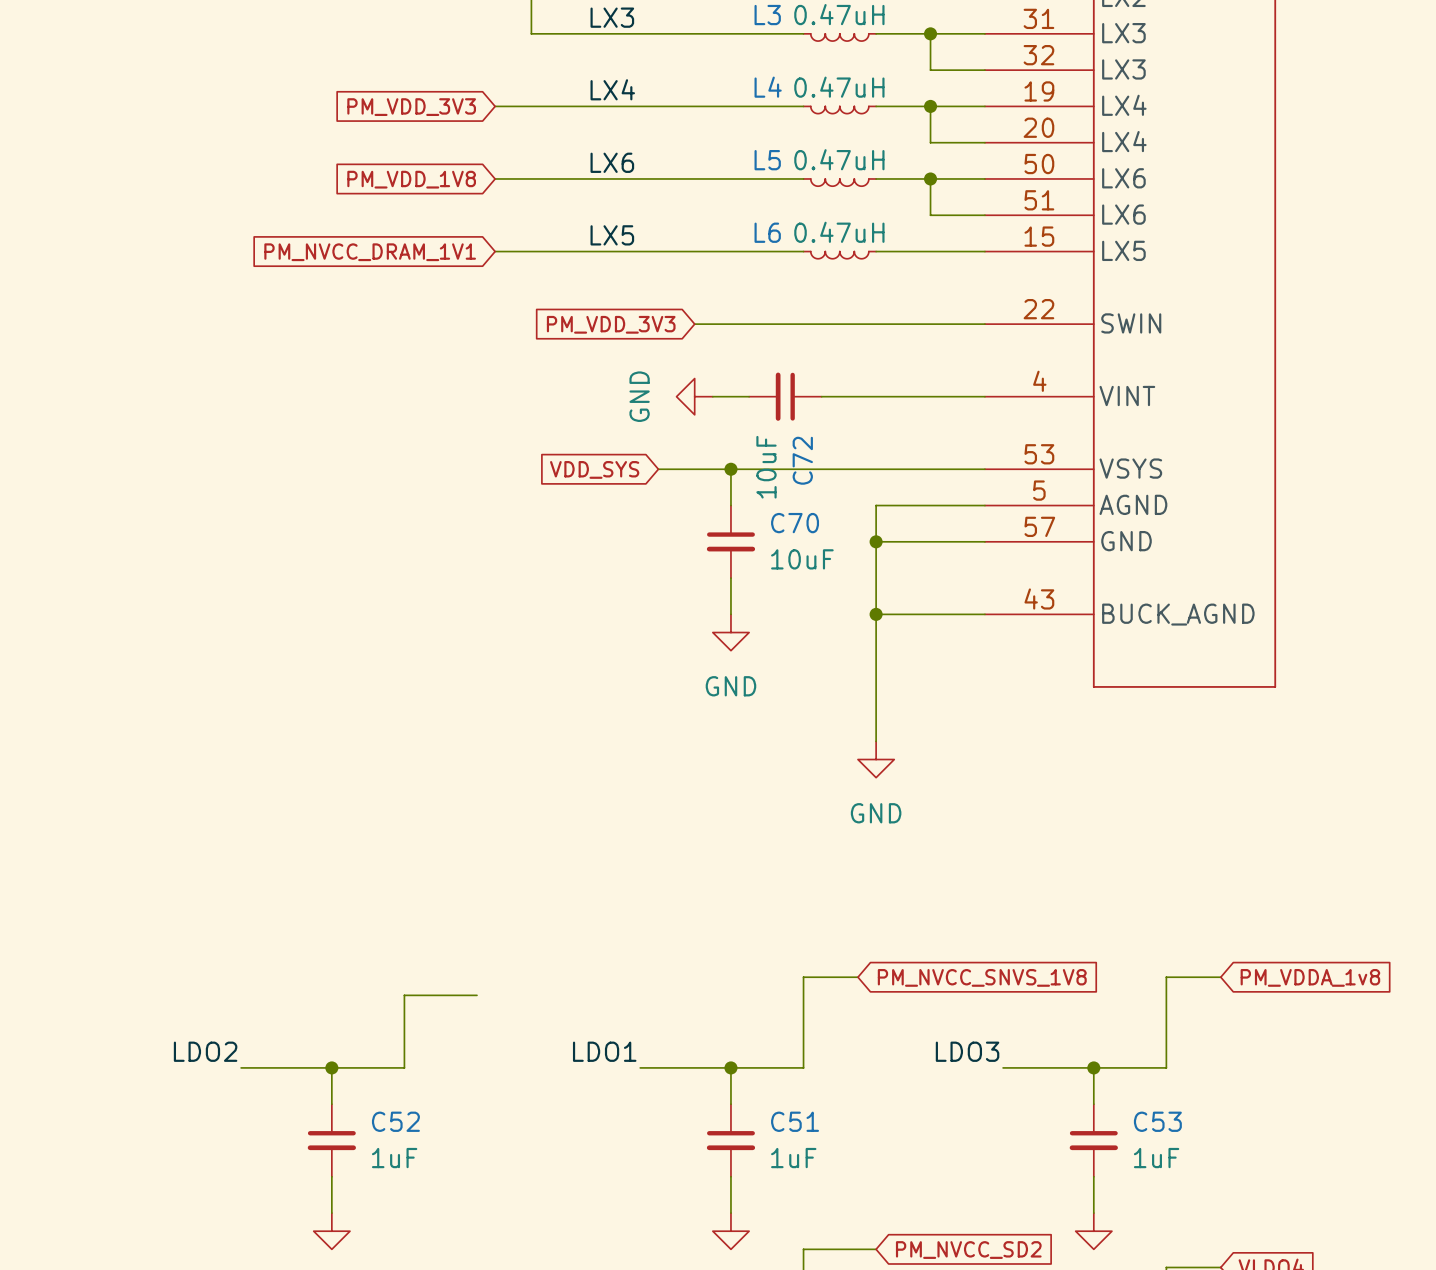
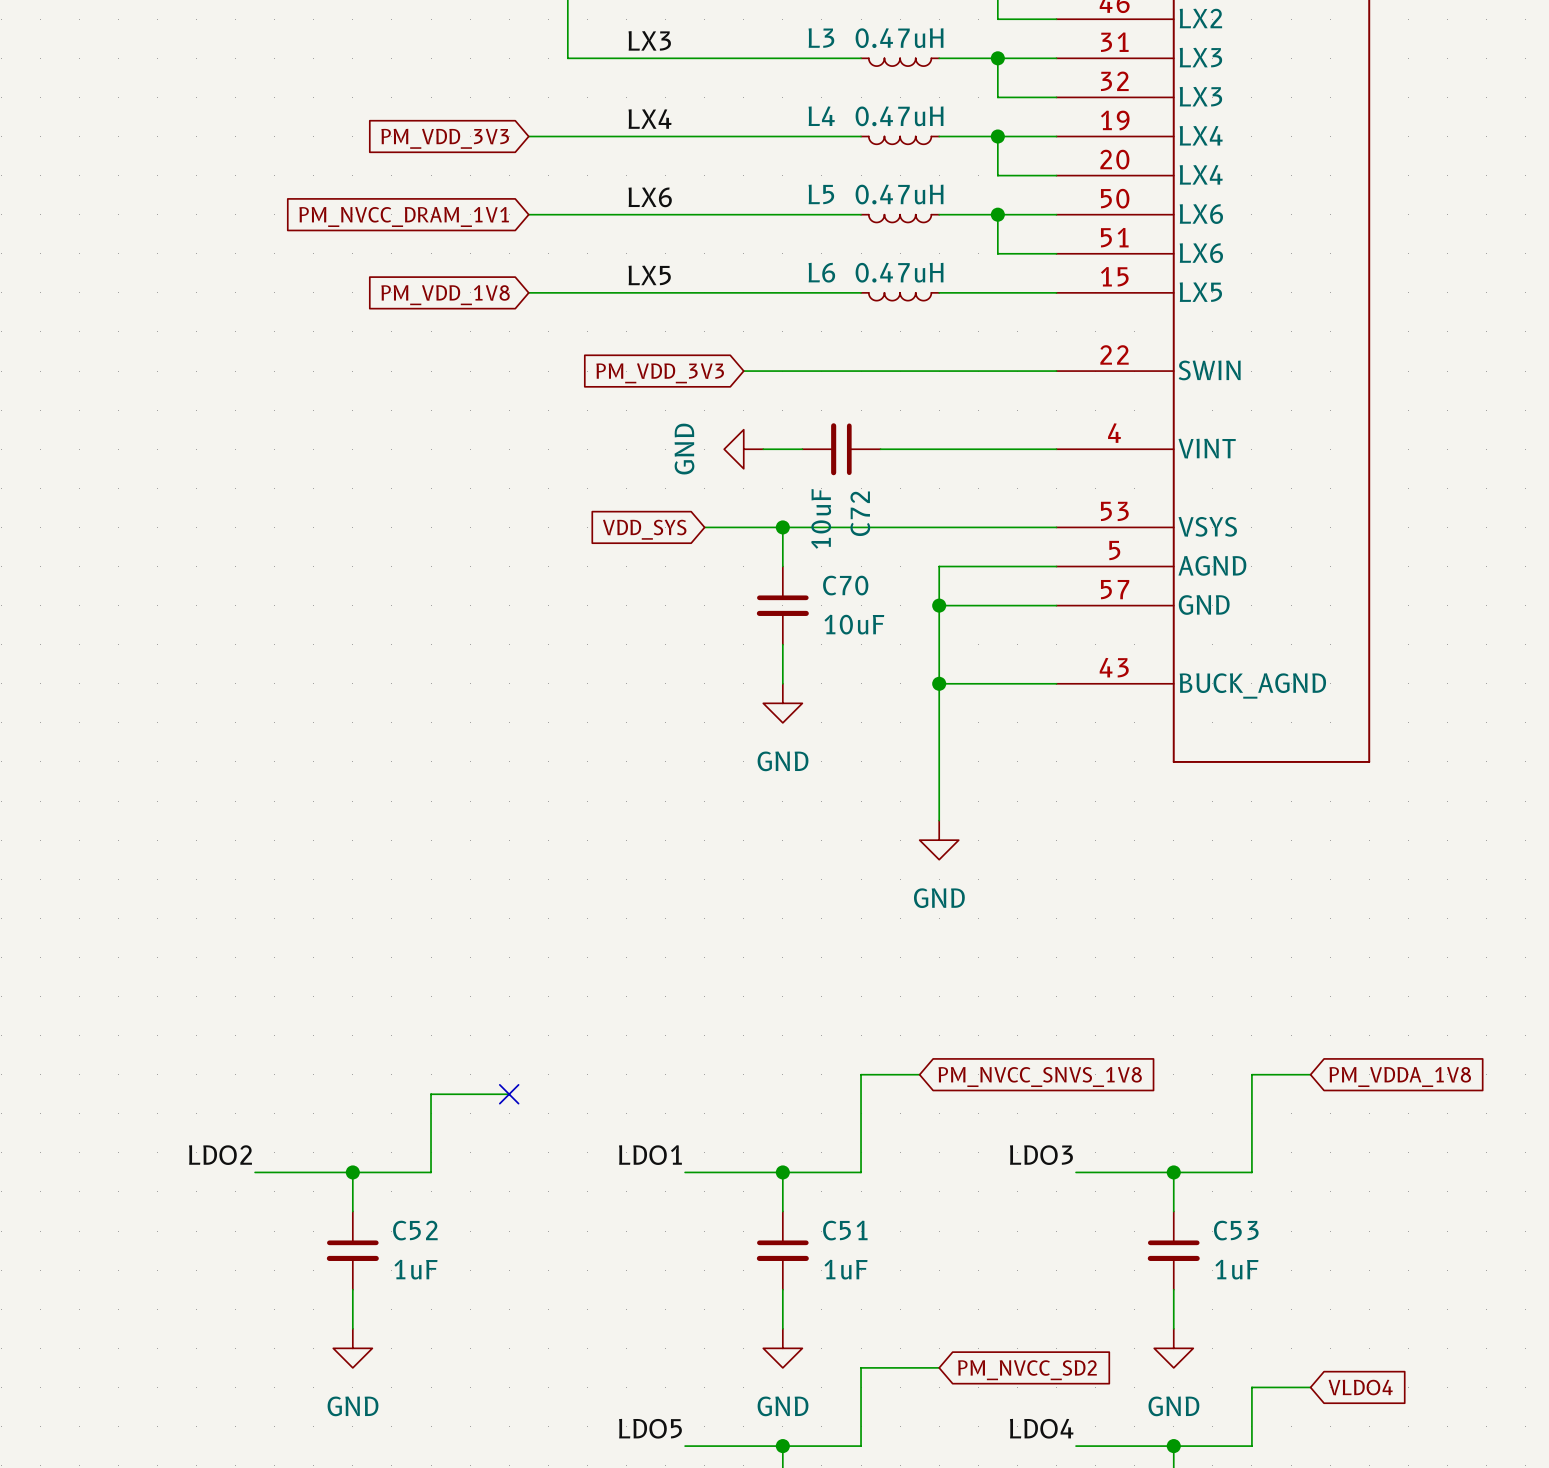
global label: PM_VDD_1V8 (411, 179) -> PM_NVCC_DRAM_1V1 (404, 216)
global label: PM_NVCC_DRAM_1V1 (370, 252) -> PM_VDD_1V8 (445, 295)
global label: PM_VDDA_1v8 (1310, 977) -> PM_VDDA_1V8 (1400, 1077)
no-connect mark: none -> (509, 1094)

